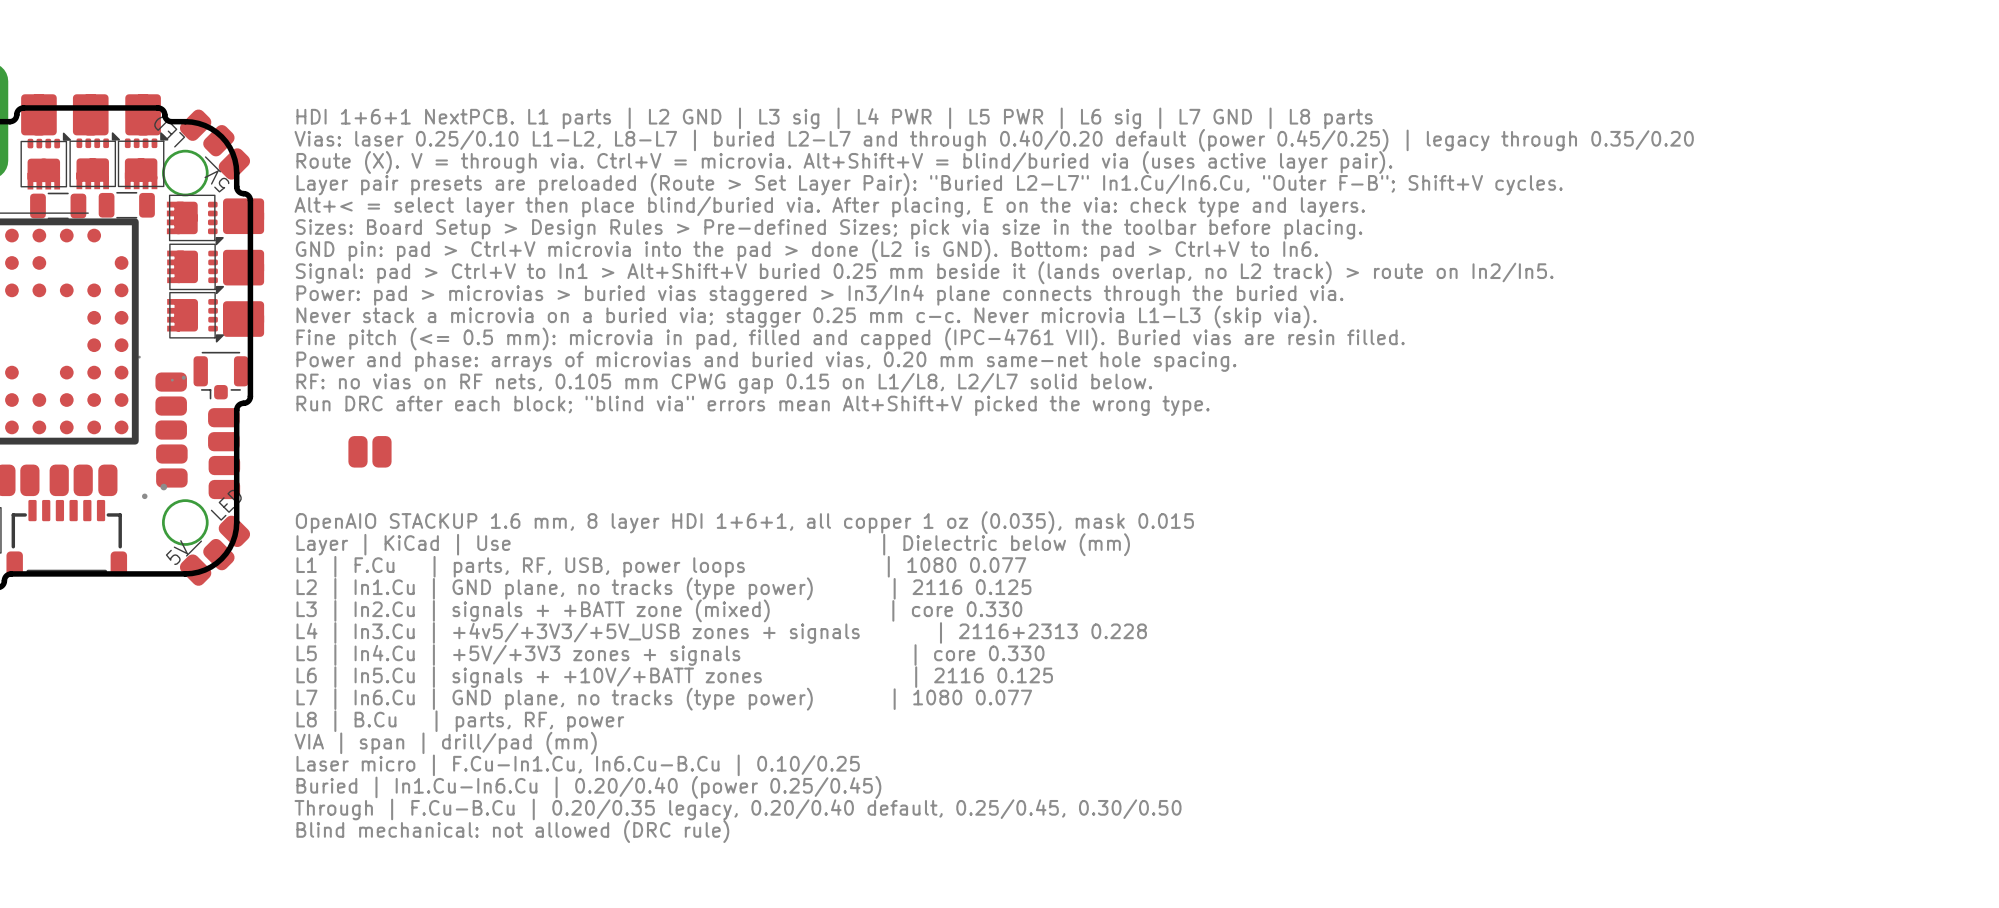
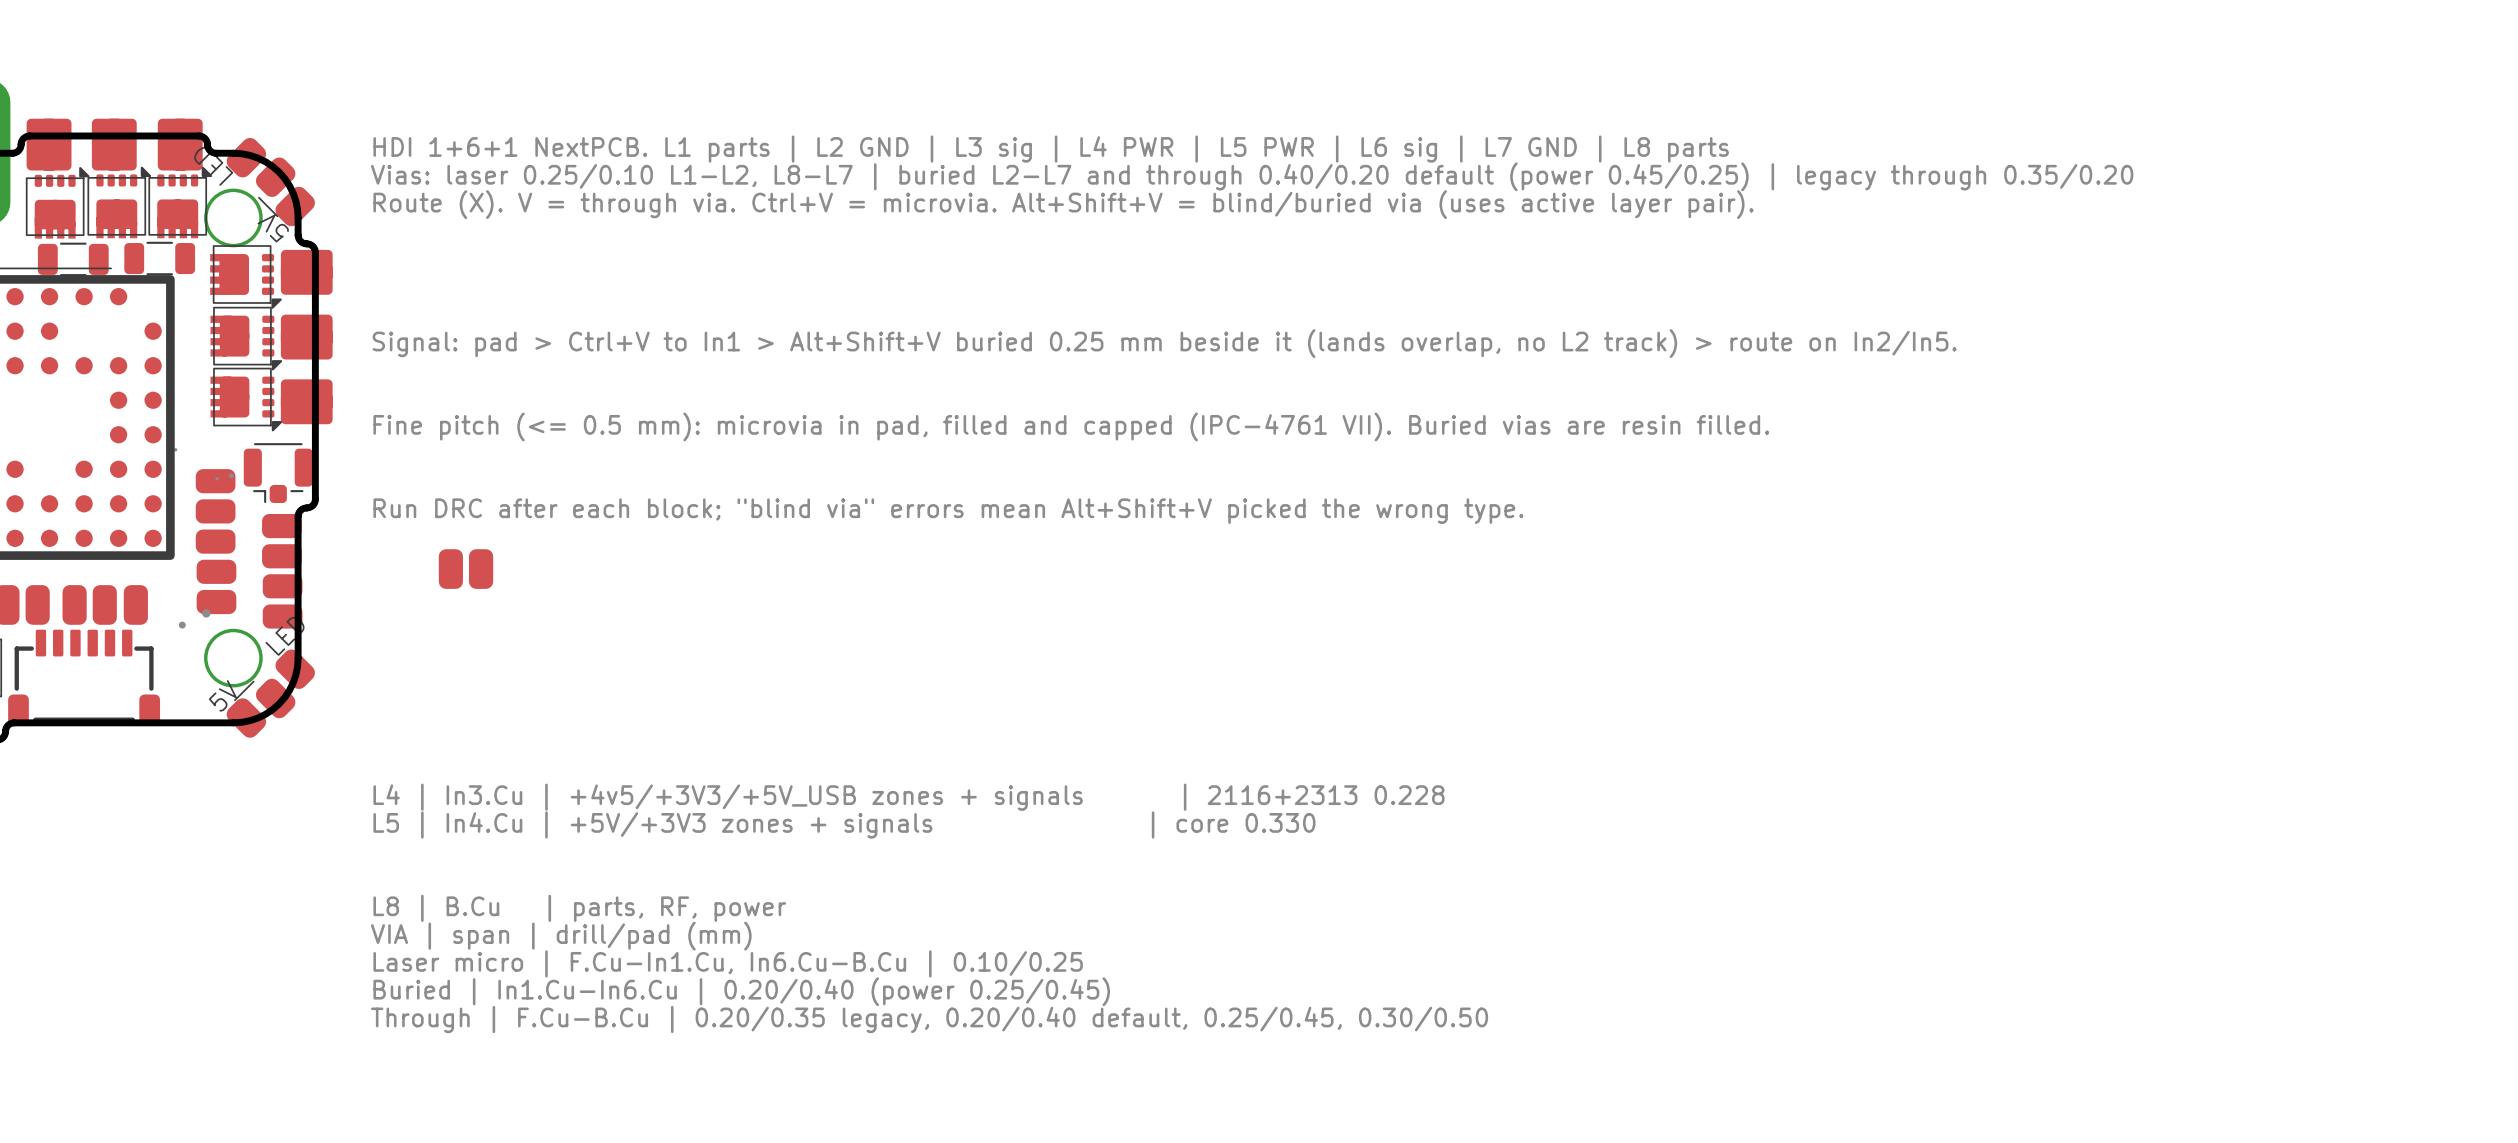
text: Layer pair presets are preloaded (Route > Set Layer Pair): "Buried L2-L7" In1.Cu/In6.Cu, "Outer F-B"; Shift+V cycles. (929, 184) -> none
text: Alt+< = select layer then place blind/buried via. After placing, E on the via: check type and layers. (829, 206) -> none
text: Sizes: Board Setup > Design Rules > Pre-defined Sizes; pick via size in the toolbar before placing. (829, 229) -> none
text: GND pin: pad > Ctrl+V microvia into the pad > done (L2 is GND). Bottom: pad > Ctrl+V to In6. (806, 250) -> none
text: Power: pad > microvias > buried vias staggered > In3/In4 plane connects through the buried via. (819, 295) -> none
text: Never stack a microvia on a buried via; stagger 0.25 mm c-c. Never microvia L1-L3 (skip via). (806, 316) -> none
text: Power and phase: arrays of microvias and buried vias, 0.20 mm same-net hole spacing. (766, 361) -> none
text: RF: no vias on RF nets, 0.105 mm CPWG gap 0.15 on L1/L8, L2/L7 solid below. (724, 383) -> none
text: OpenAIO STACKUP 1.6 mm, 8 layer HDI 1+6+1, all copper 1 oz (0.035), mask 0.015 (744, 522) -> none
text: Layer | KiCad | Use | Dielectric below (mm) (713, 544) -> none
text: L1 | F.Cu | parts, RF, USB, power loops | 1080 0.077 (661, 566) -> none
text: L2 | In1.Cu | GND plane, no tracks (type power) | 2116 0.125 (663, 588) -> none
text: L3 | In2.Cu | signals + +BATT zone (mixed) | core 0.330 (659, 610) -> none
text: L6 | In5.Cu | signals + +10V/+BATT zones | 2116 0.125 (674, 677) -> none
text: L7 | In6.Cu | GND plane, no tracks (type power) | 1080 0.077 (664, 699) -> none
text: Blind mechanical: not allowed (DRC rule) (512, 831) -> none

